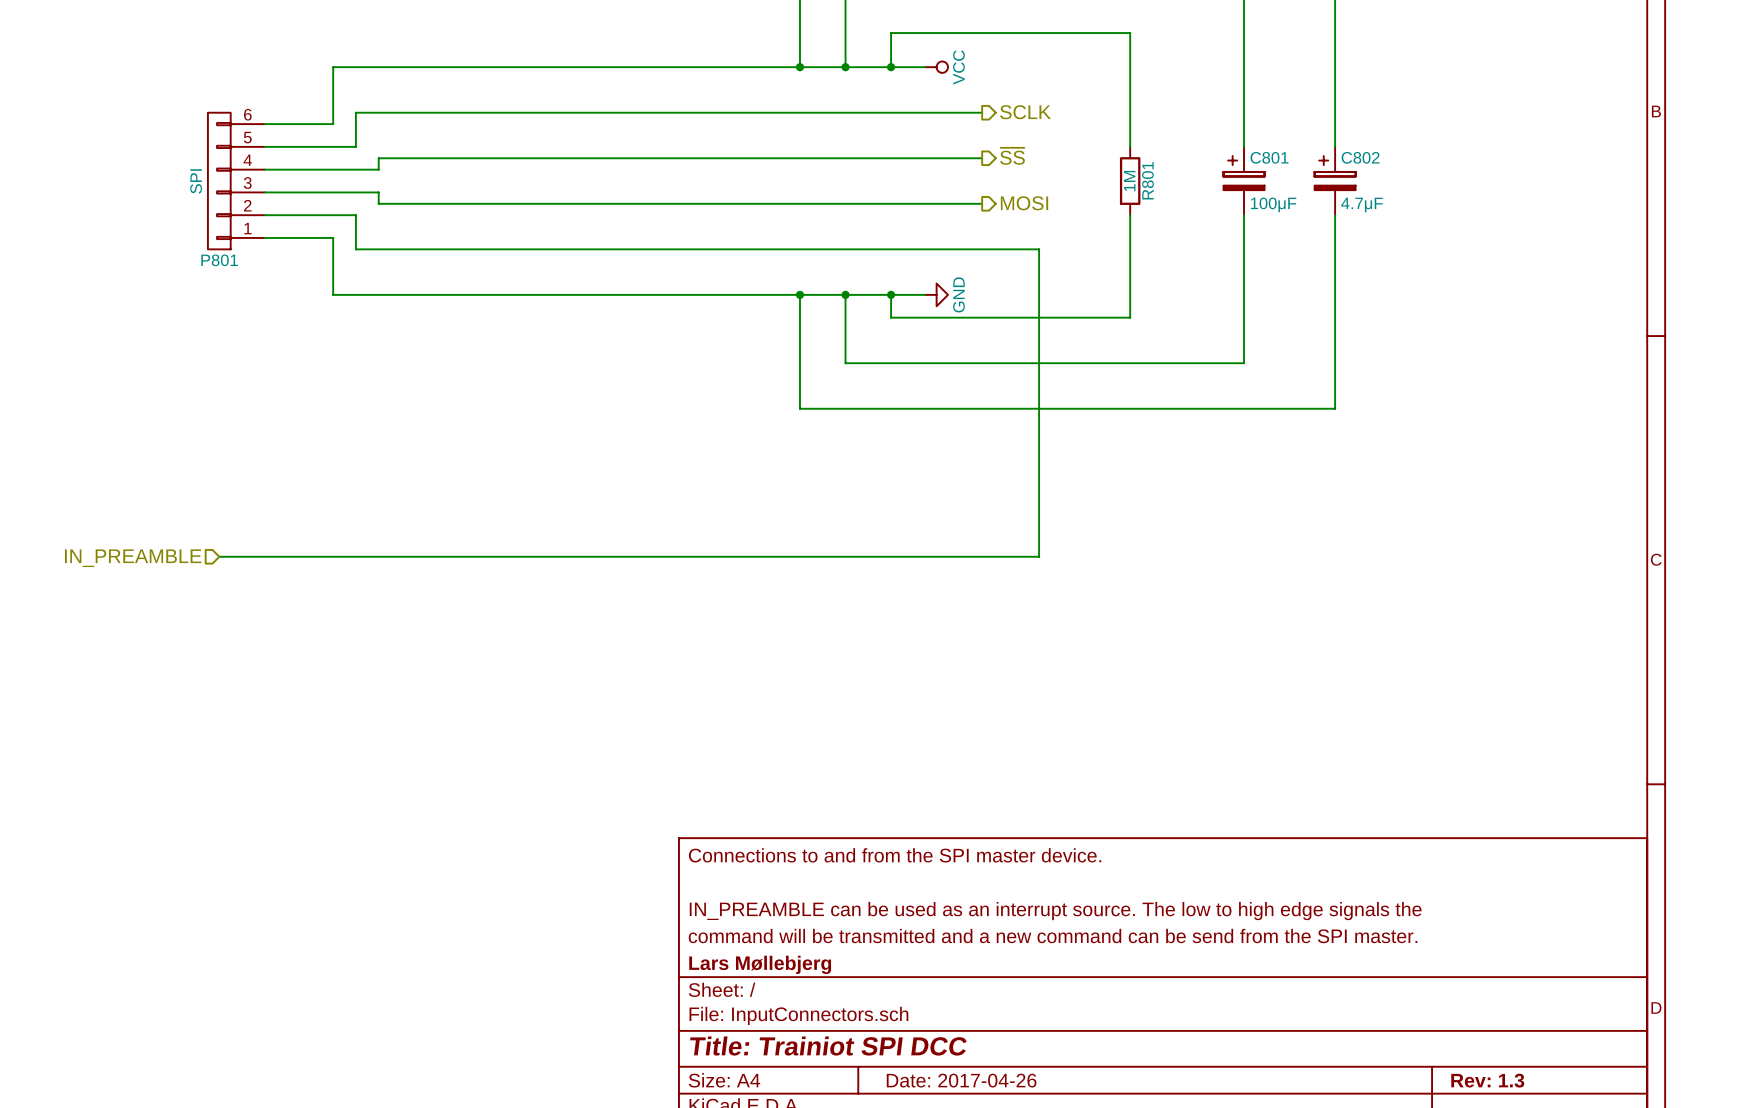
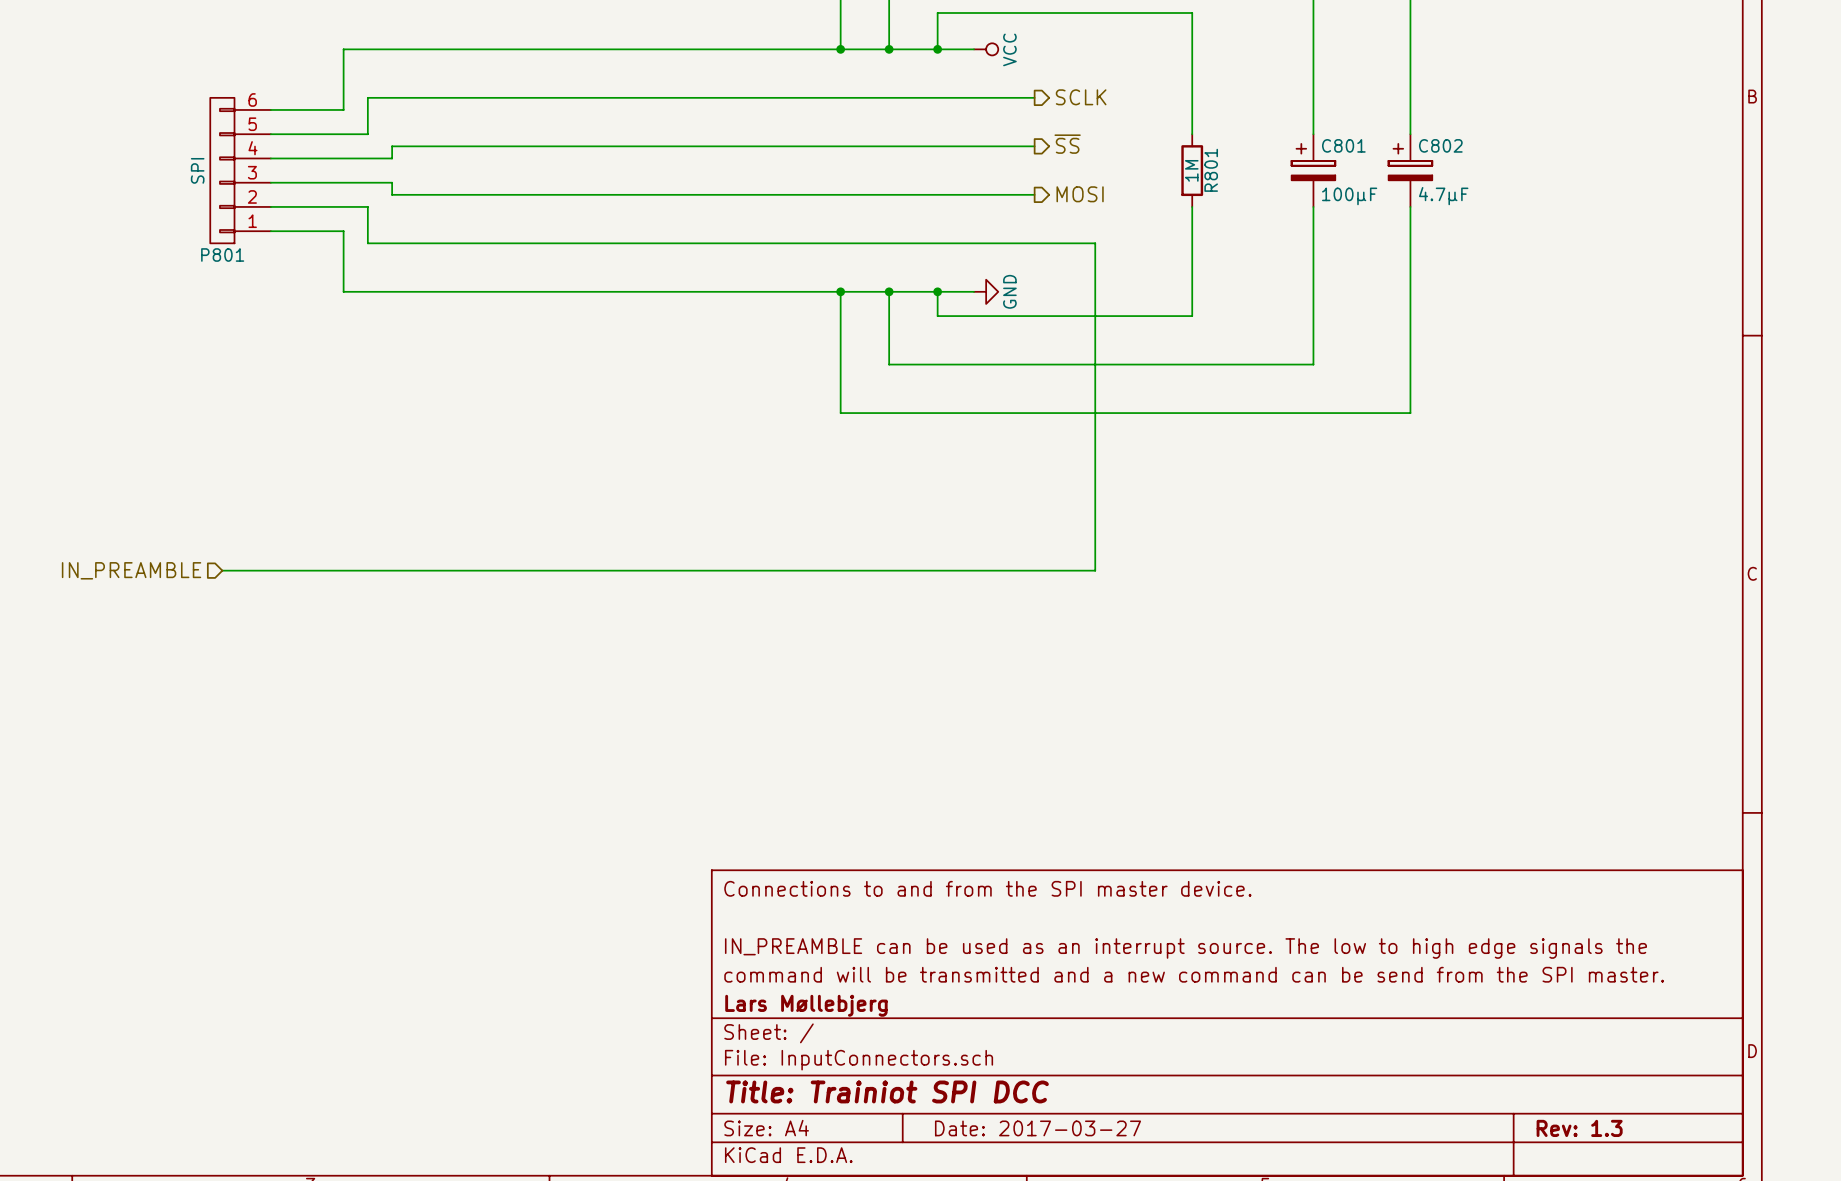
title block: Date: 2017-04-26 (961, 1080) -> Date: 2017-03-27 (1038, 1128)

